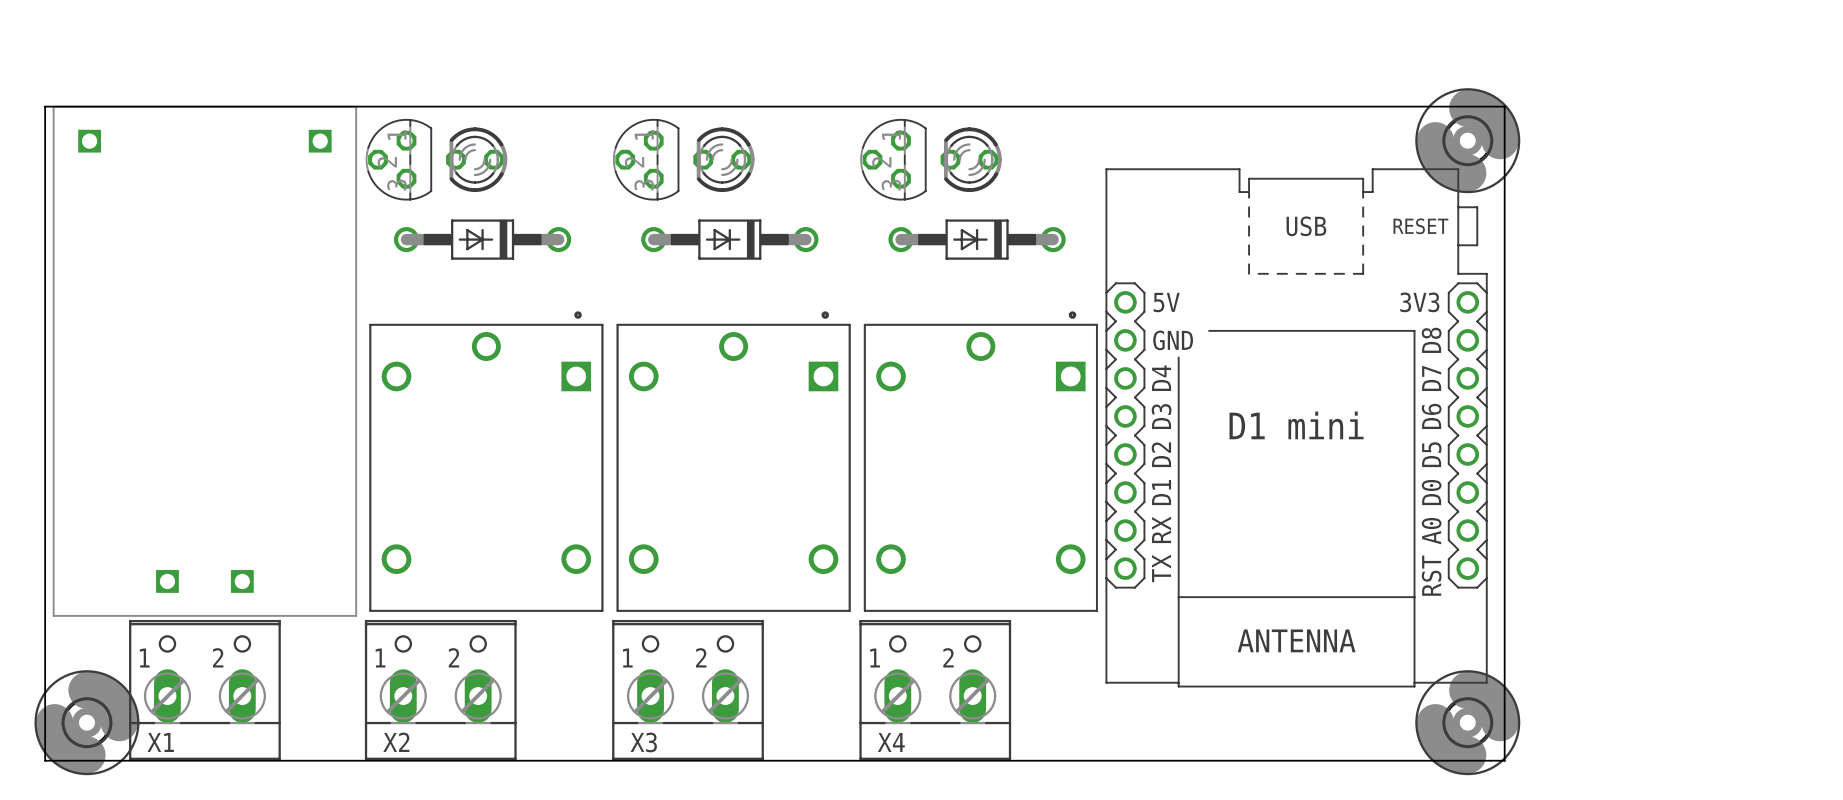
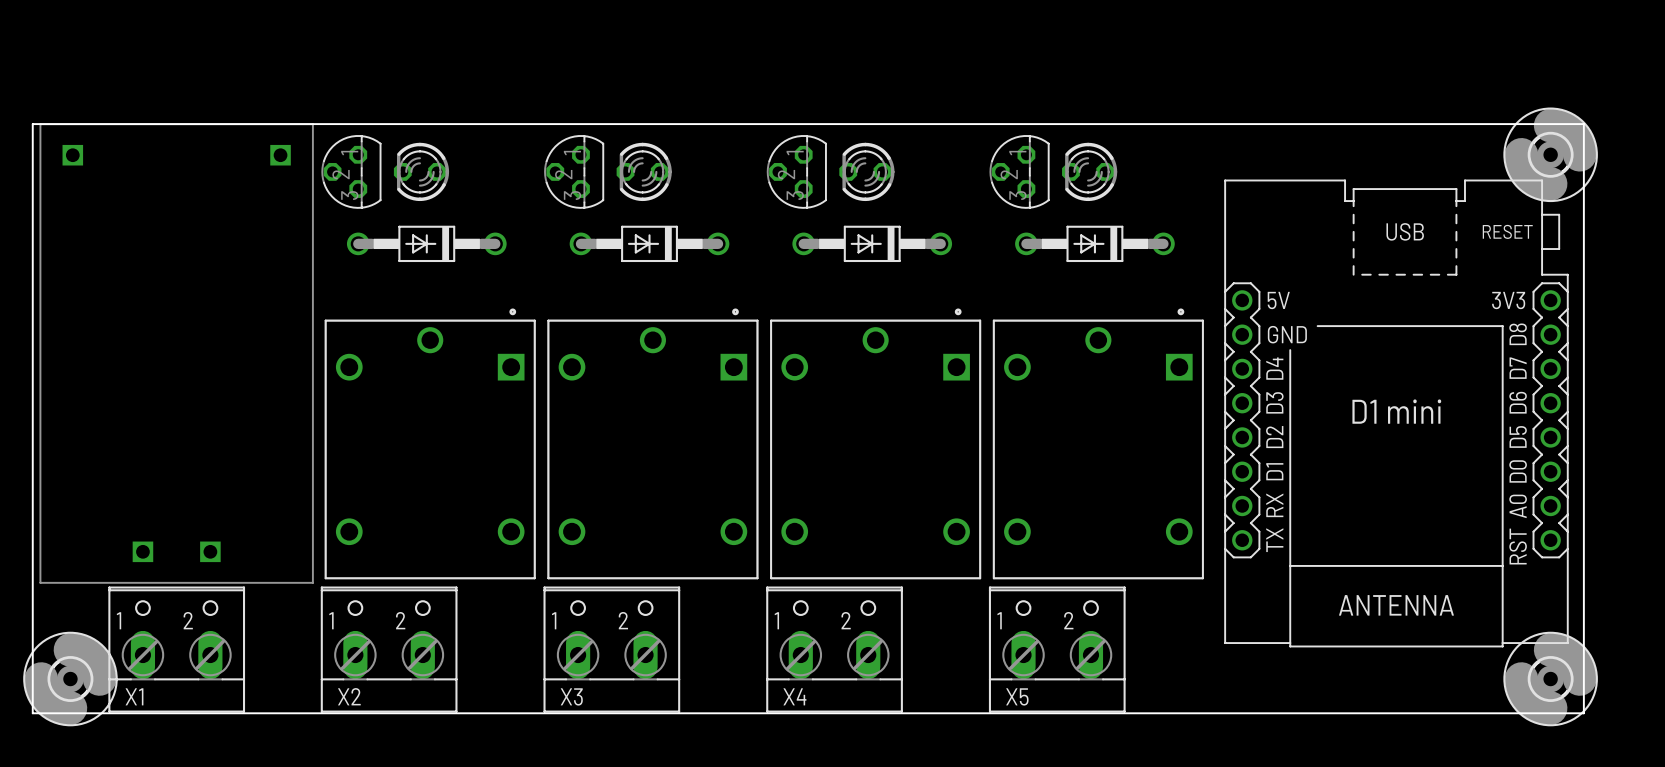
board edge: (1504, 106) (1504, 760) -> (1347, 124) (1583, 124) (1583, 713) (1347, 713)
part position: (1467, 140) -> (1550, 154)
part: none -> (1019, 171)
part: none -> (1089, 171)
part: none -> (1094, 243)
part position: (1296, 427) -> (1396, 413)
part: none -> (1098, 443)
X5: none -> (1057, 649)
part position: (1467, 722) -> (1550, 679)

